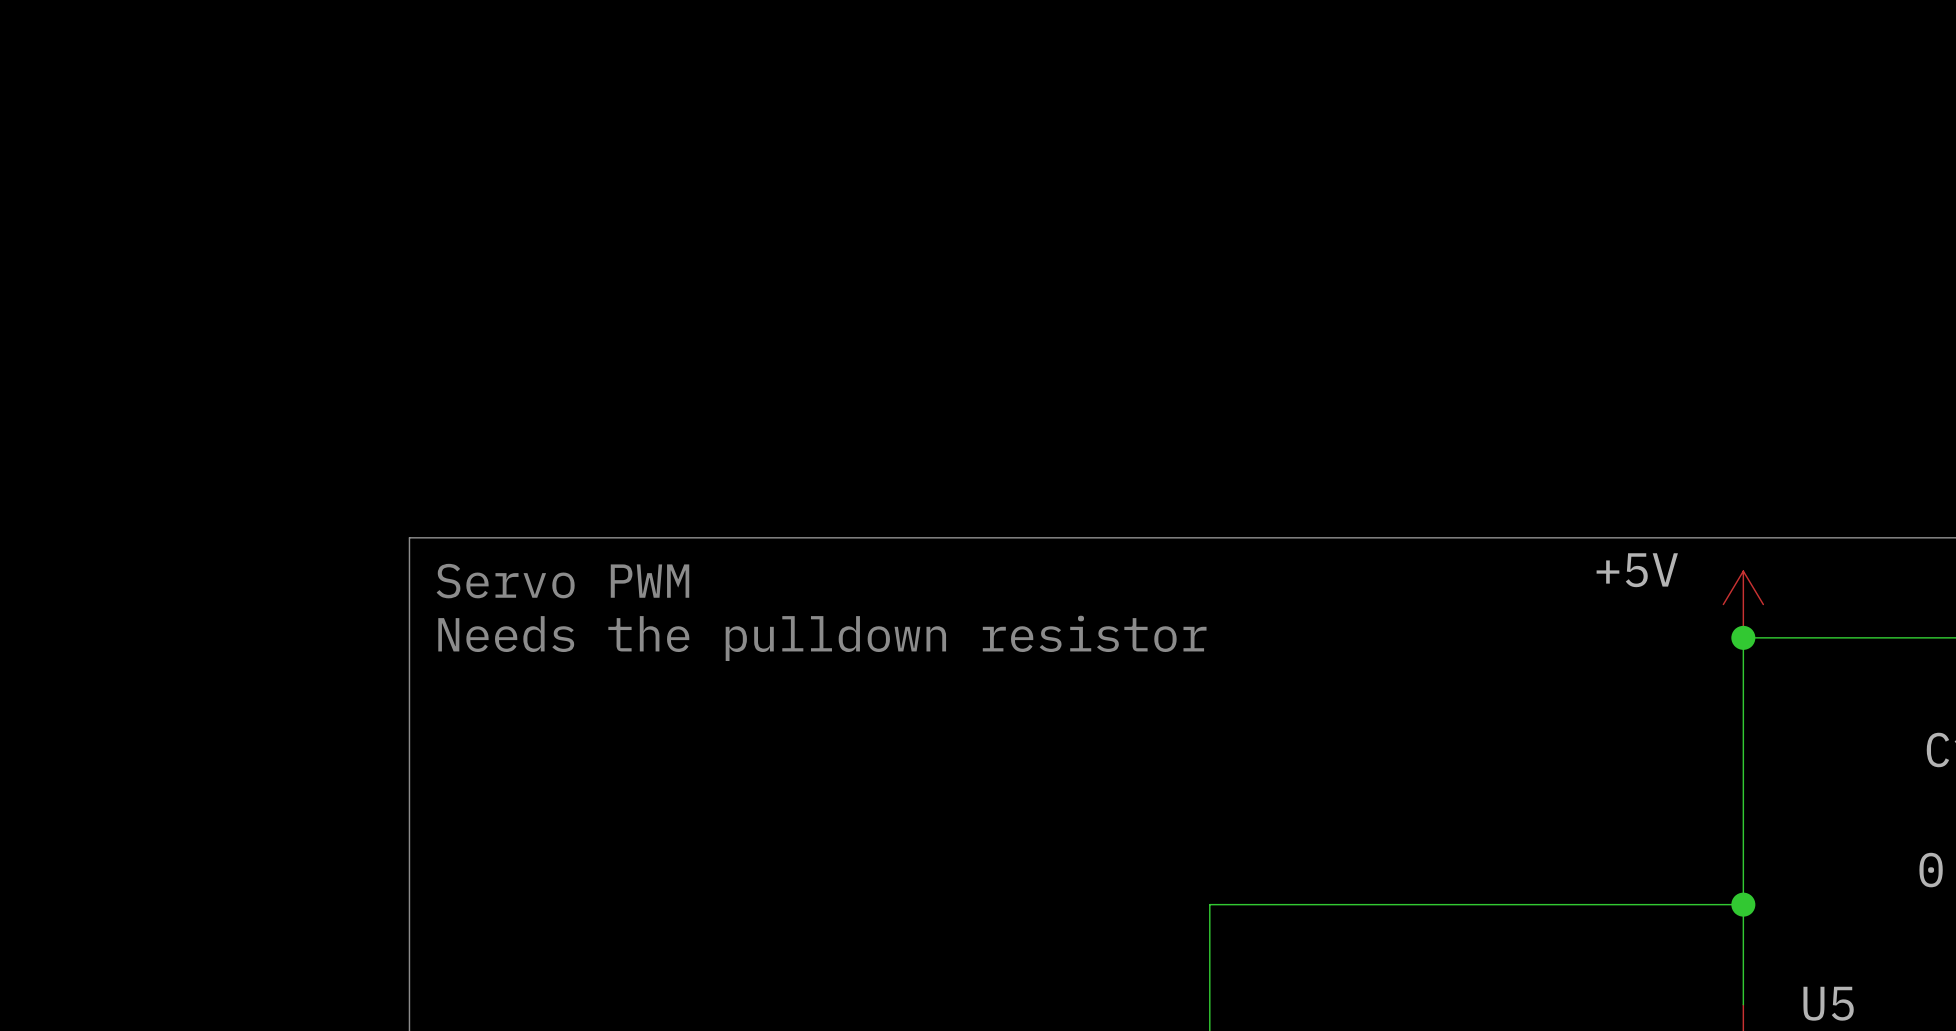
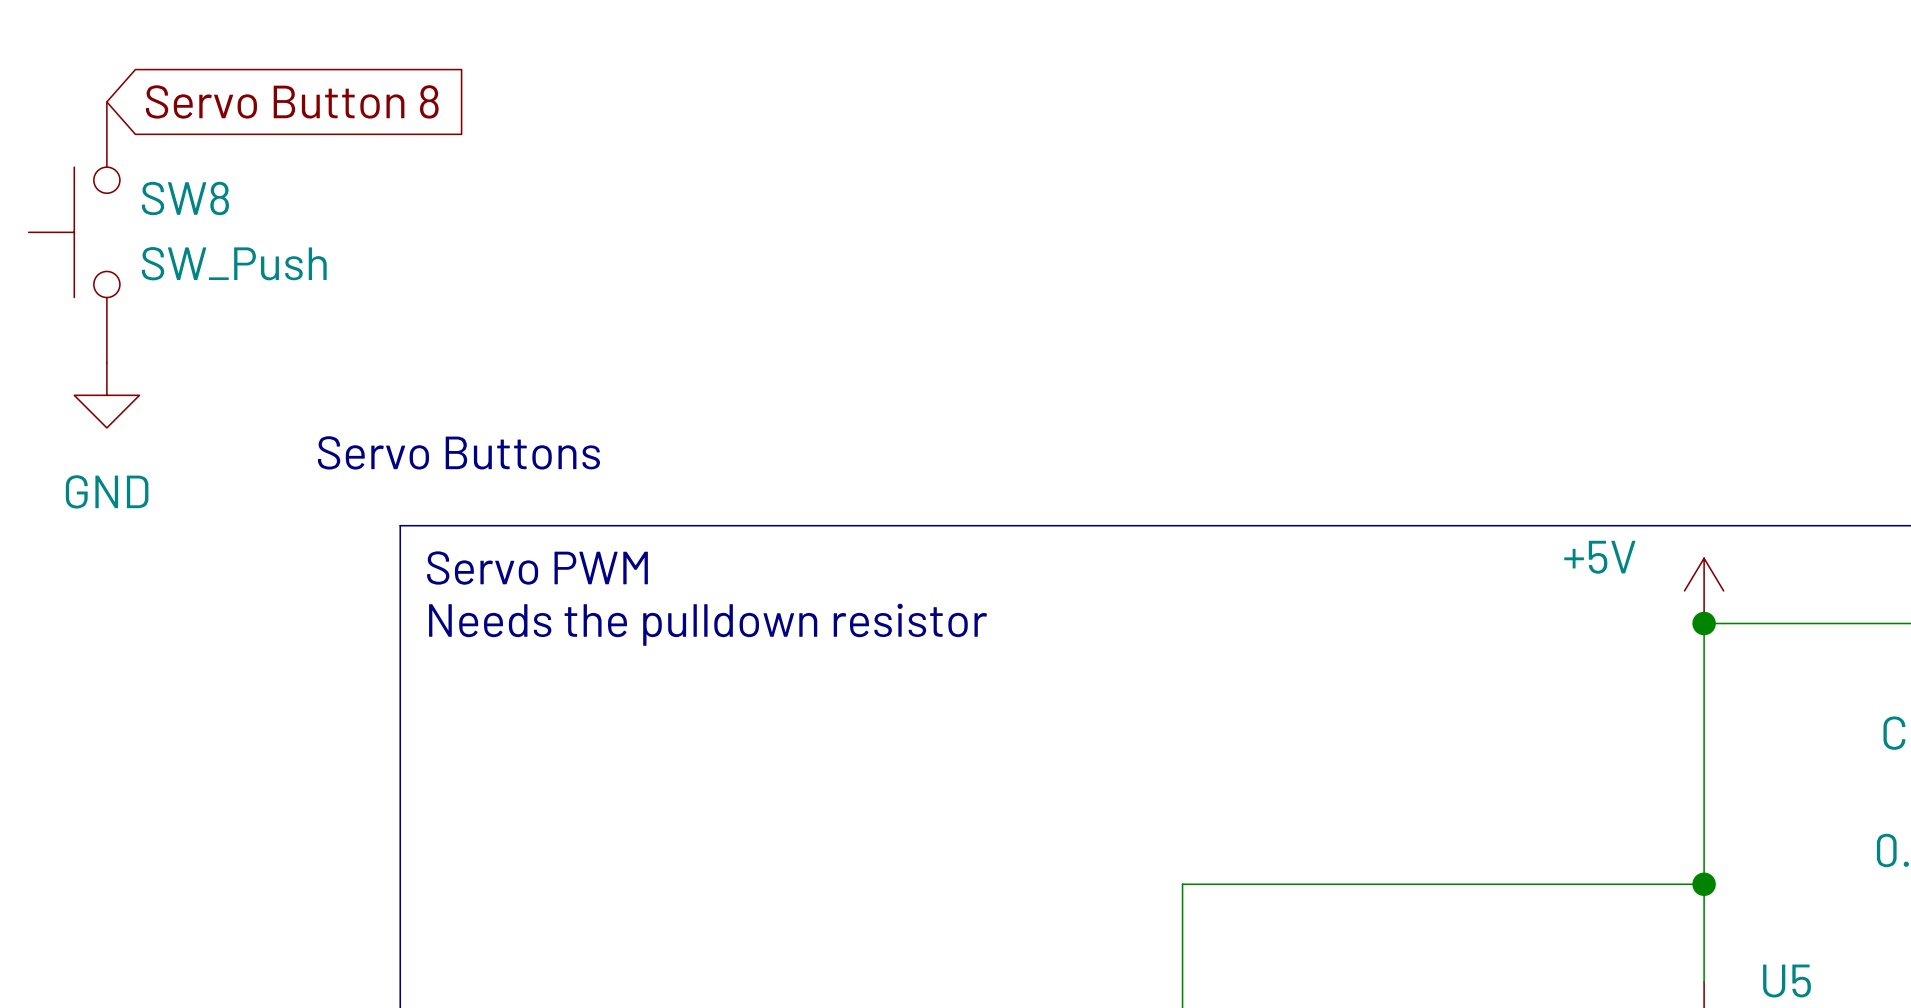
global label: none -> Servo Button 8 (292, 101)
SW8: none -> SW_Push (74, 232)
power symbol: none -> GND (106, 395)
text: none -> Servo Buttons (458, 452)

